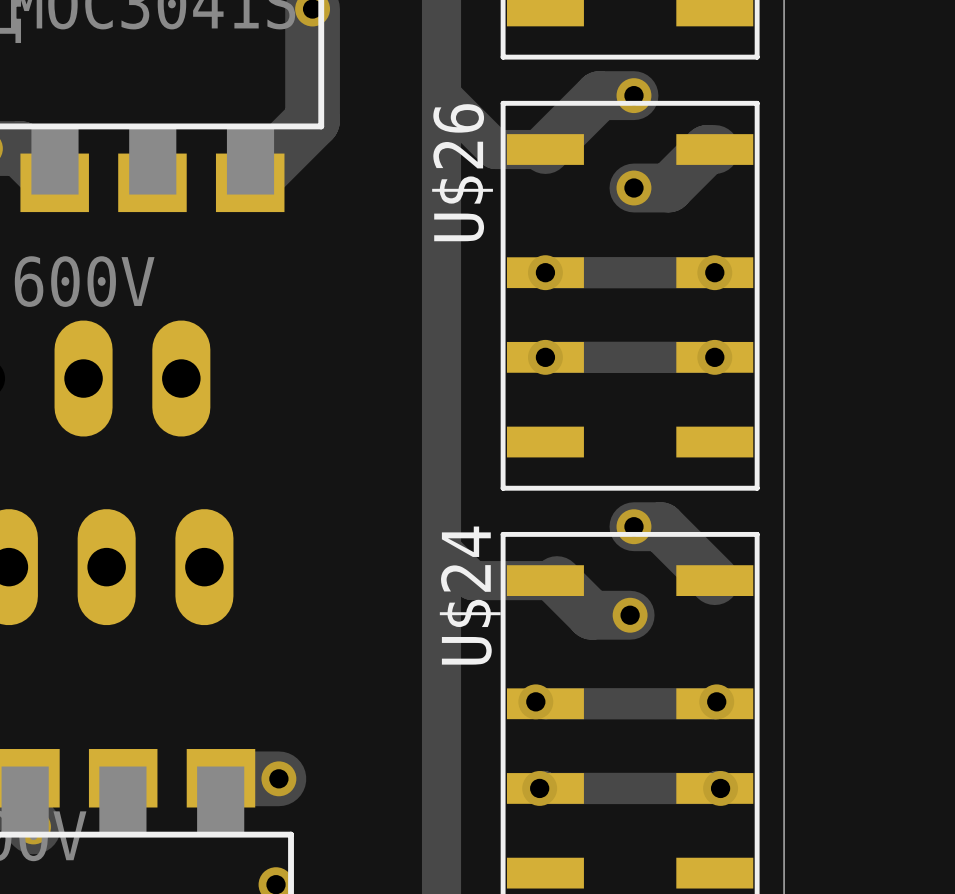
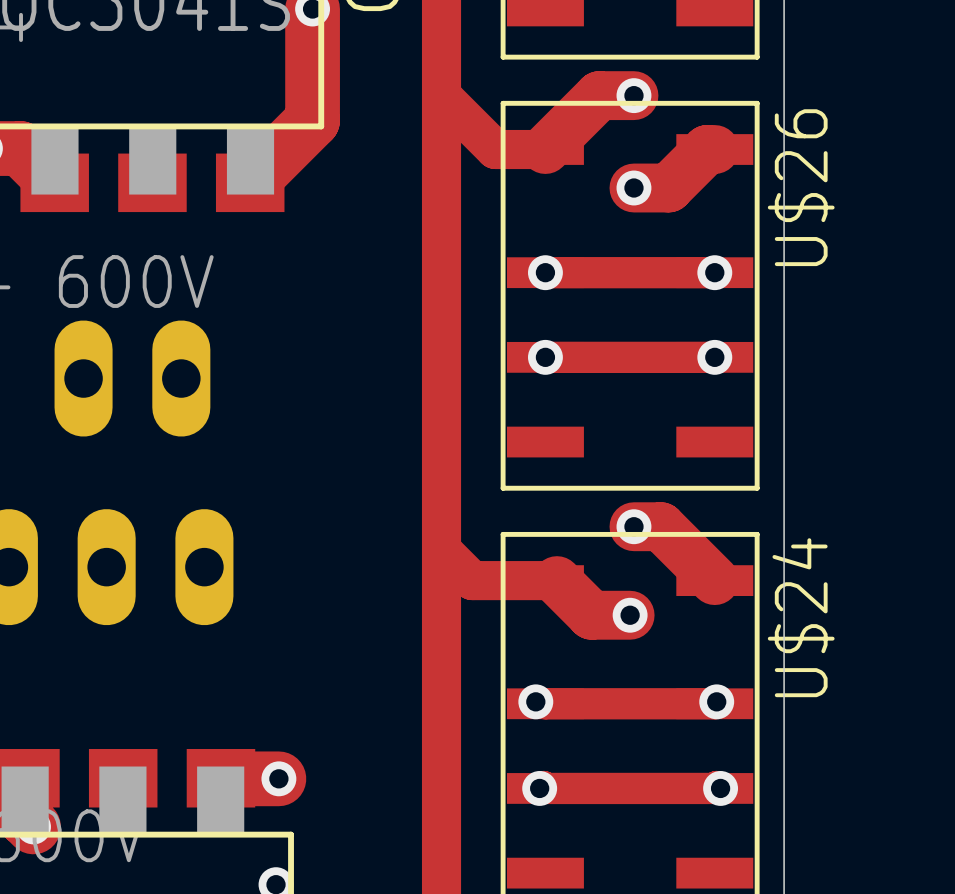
U$26 name position: U$26 (462, 172) -> U$26 (801, 187)
U$24 name position: U$24 (470, 595) -> U$24 (801, 617)

